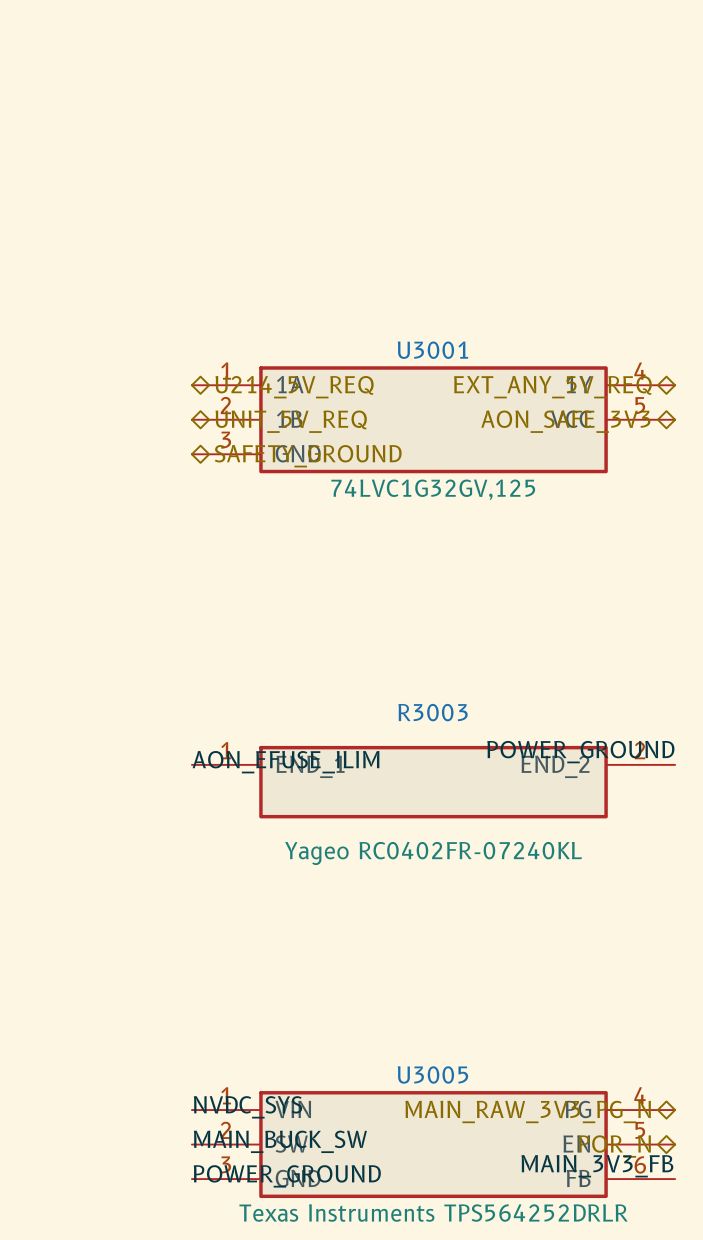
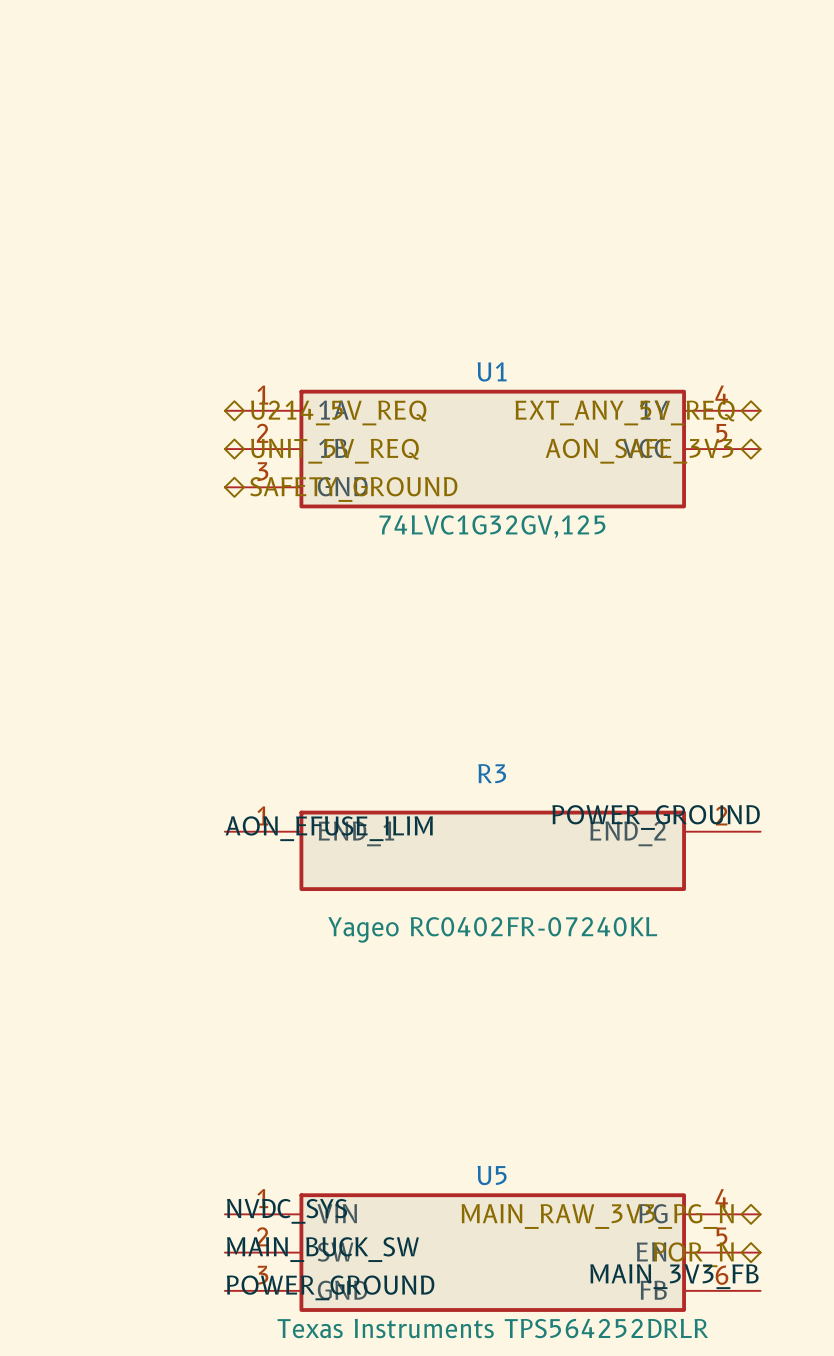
U3001 name: U3001 (432, 350) -> U1 (492, 371)
R3003 name: R3003 (433, 712) -> R3 (492, 773)
U3005 name: U3005 (432, 1074) -> U5 (492, 1175)

